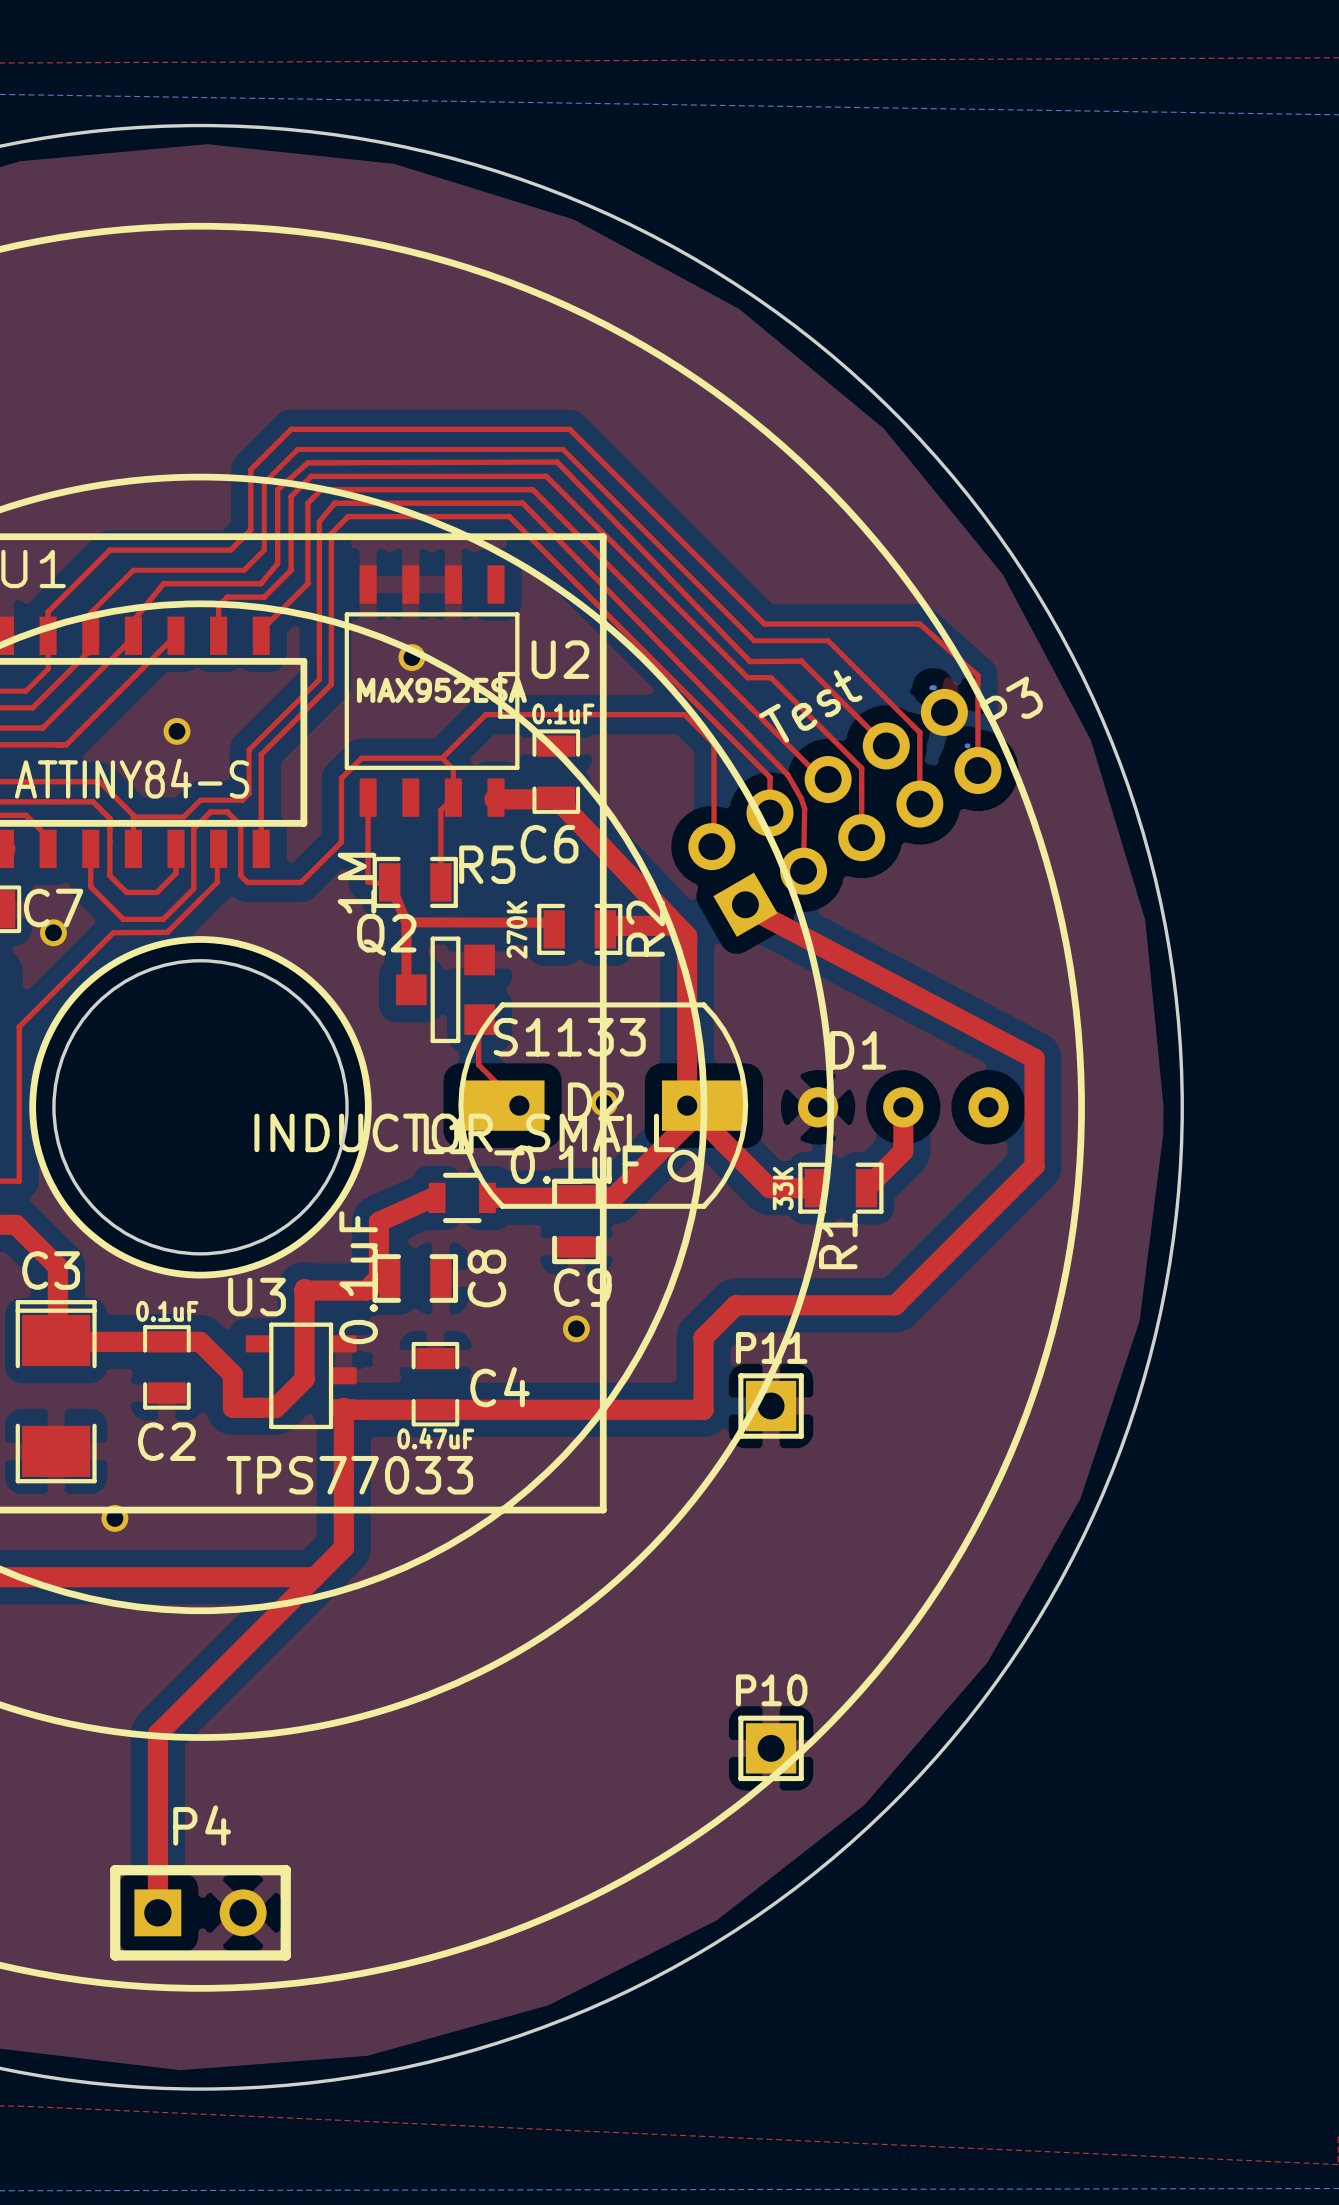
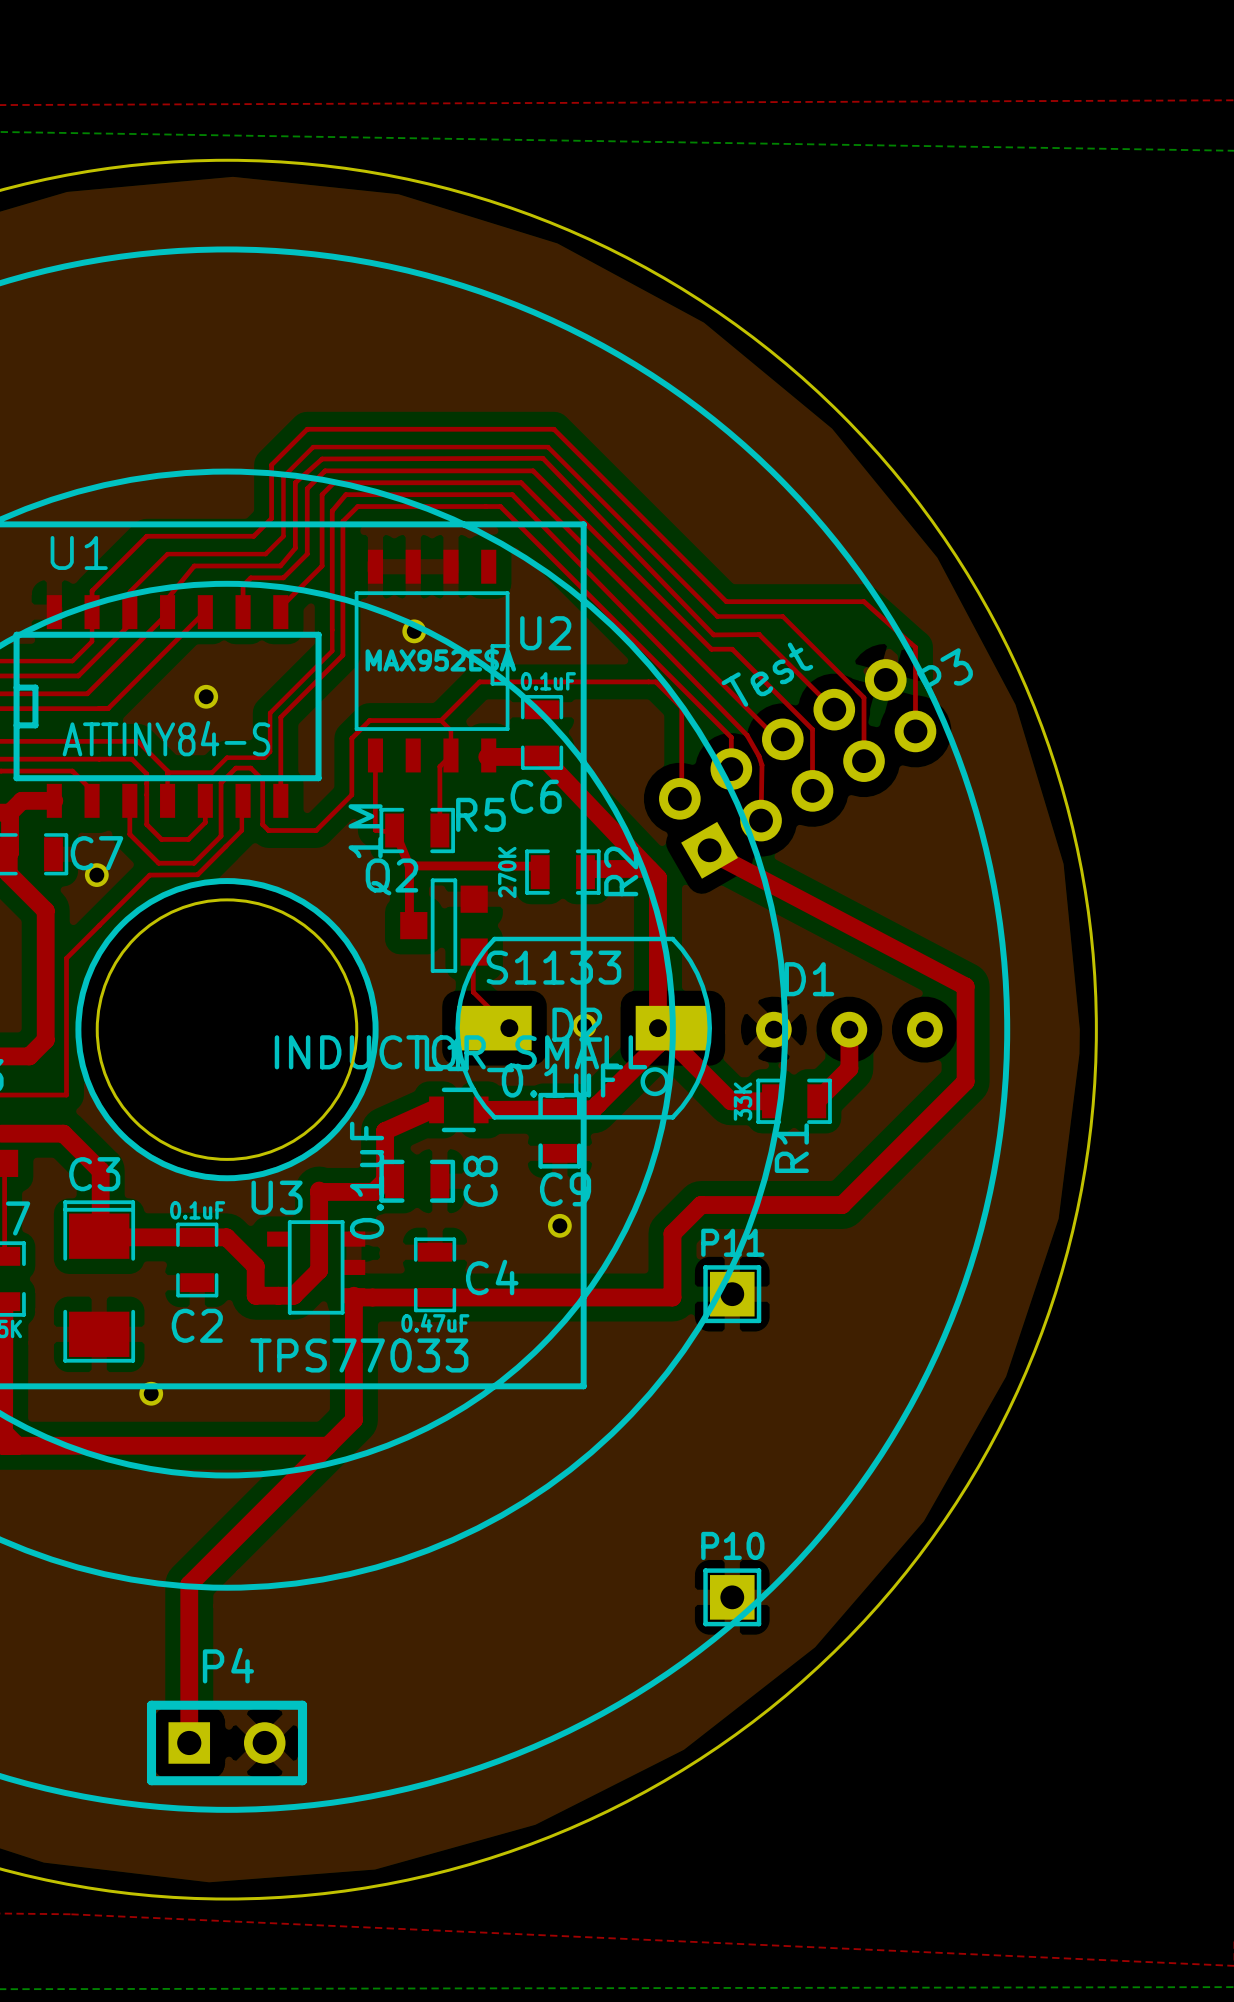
bottom track: (931, 687) (934, 687) -> none
bottom track: (967, 745) (967, 745) -> none

